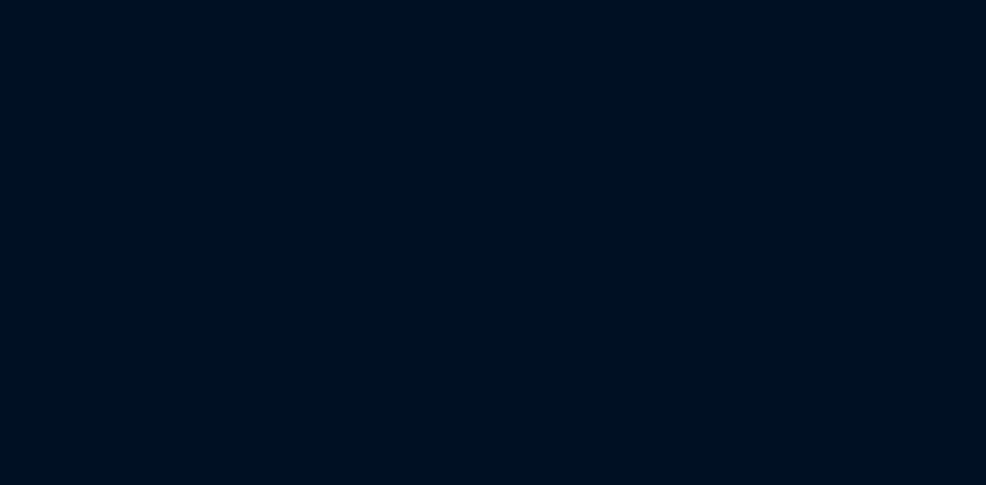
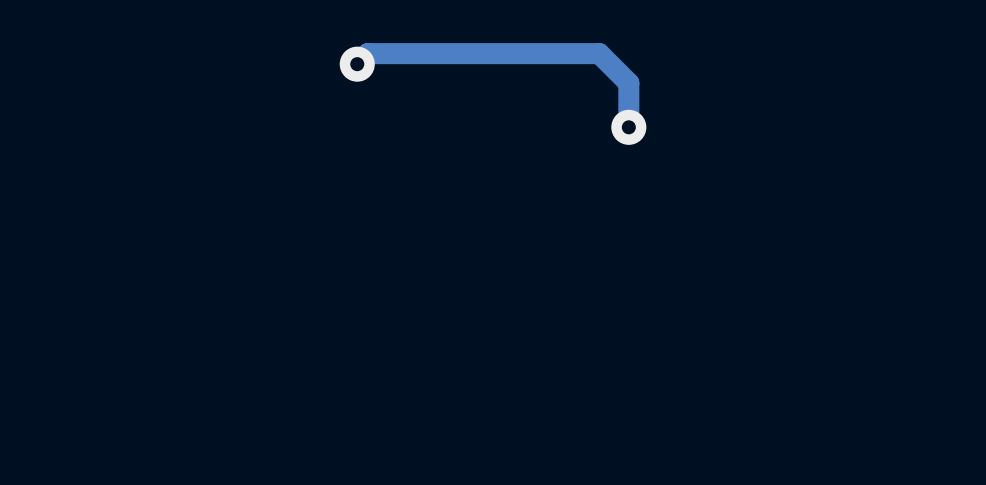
track: none -> (357, 64) (367, 53) (599, 53) (628, 83) (628, 127)
via: none -> (357, 64)
via: none -> (628, 127)

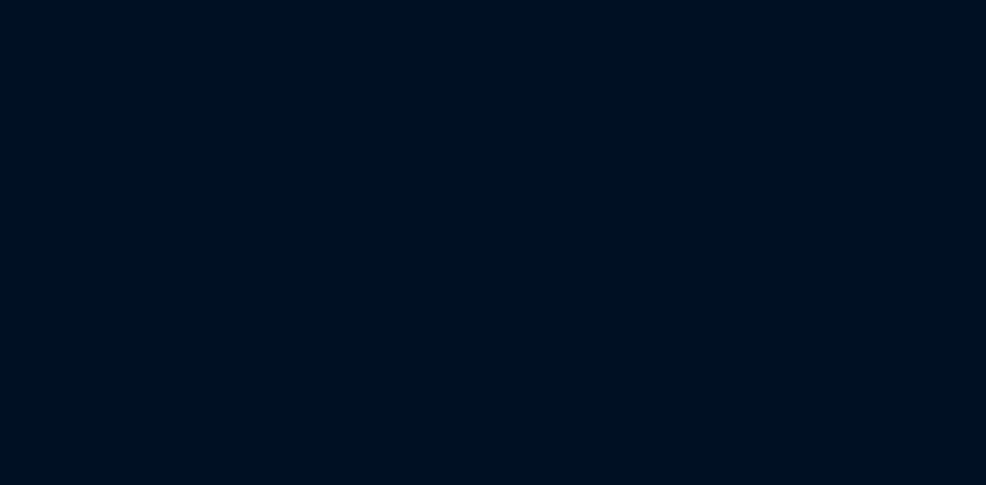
track: (357, 64) (367, 53) (599, 53) (628, 83) (628, 127) -> none
via: (357, 64) -> none
via: (628, 127) -> none

